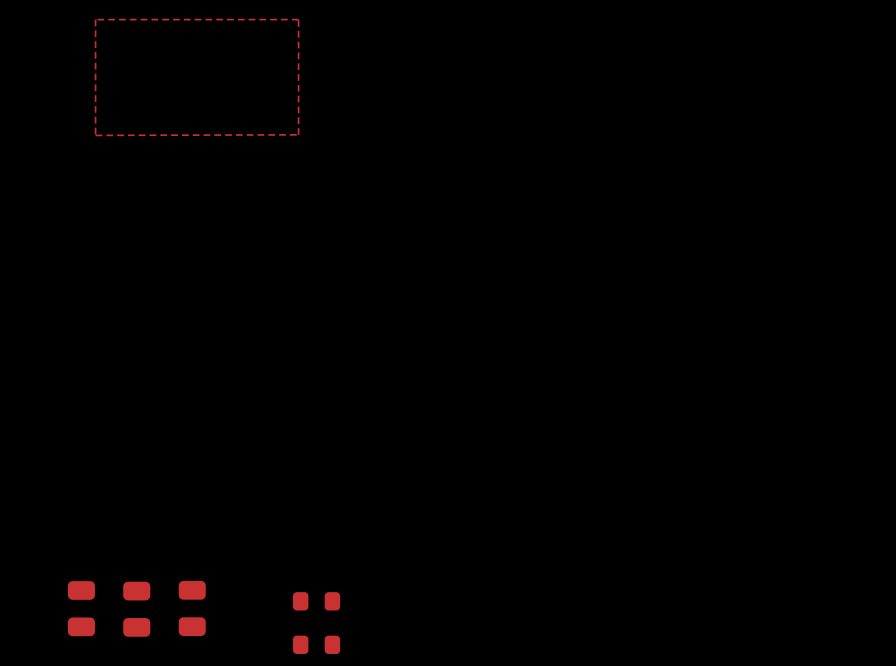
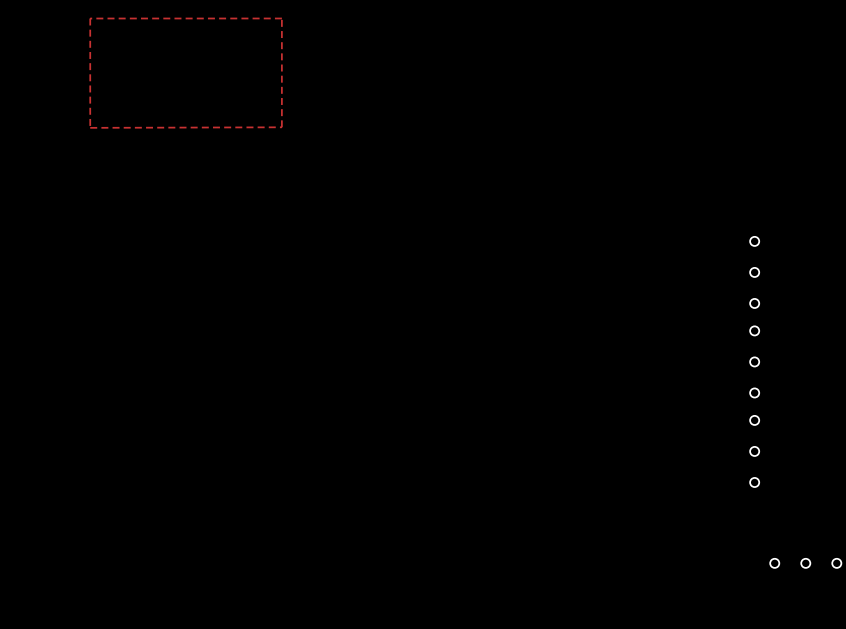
part: none -> (754, 272)
part: none -> (754, 361)
part: none -> (754, 451)
part: none -> (805, 563)
part: (316, 601) -> none
part: (81, 608) -> none
part: (192, 608) -> none
part: (136, 609) -> none
part: (316, 644) -> none

